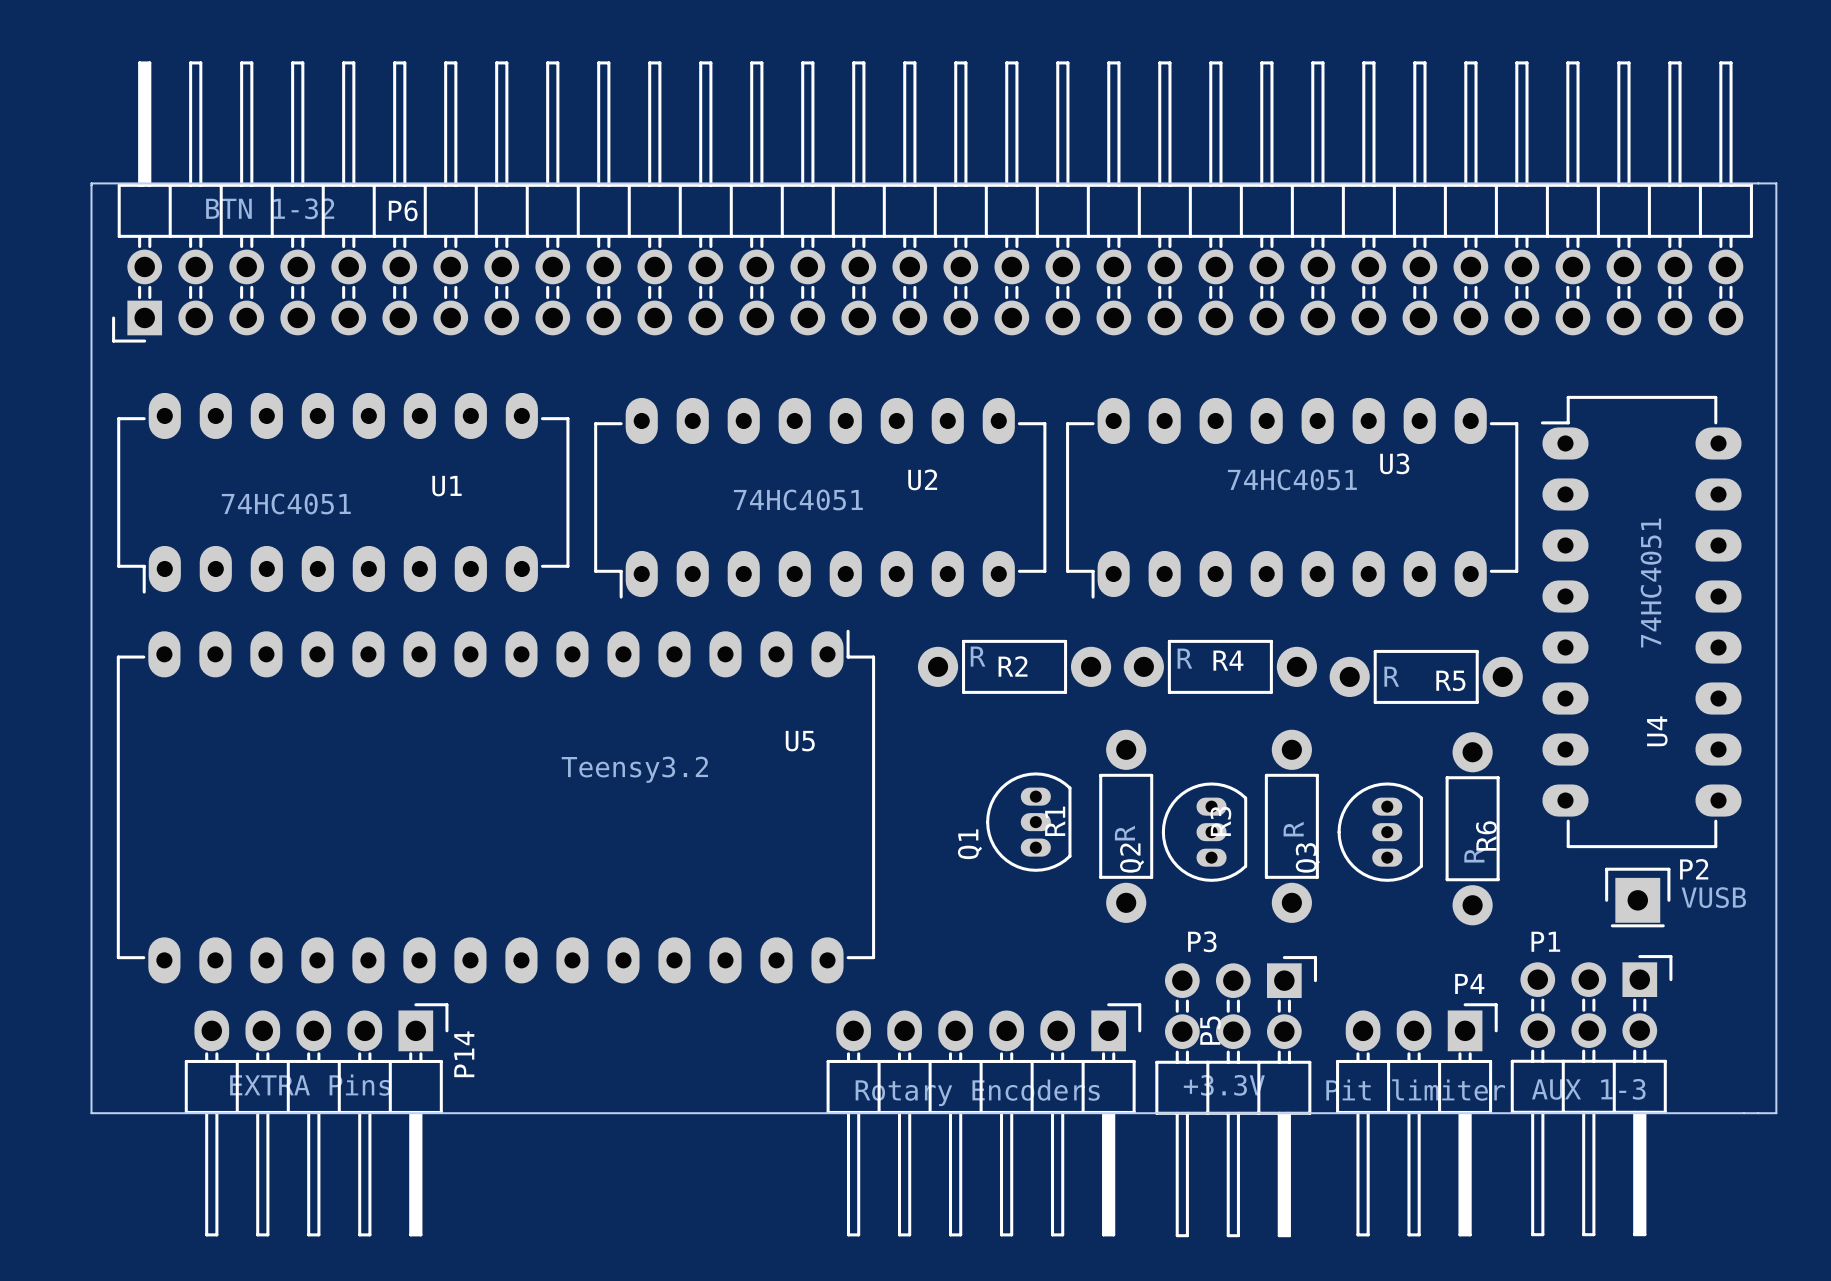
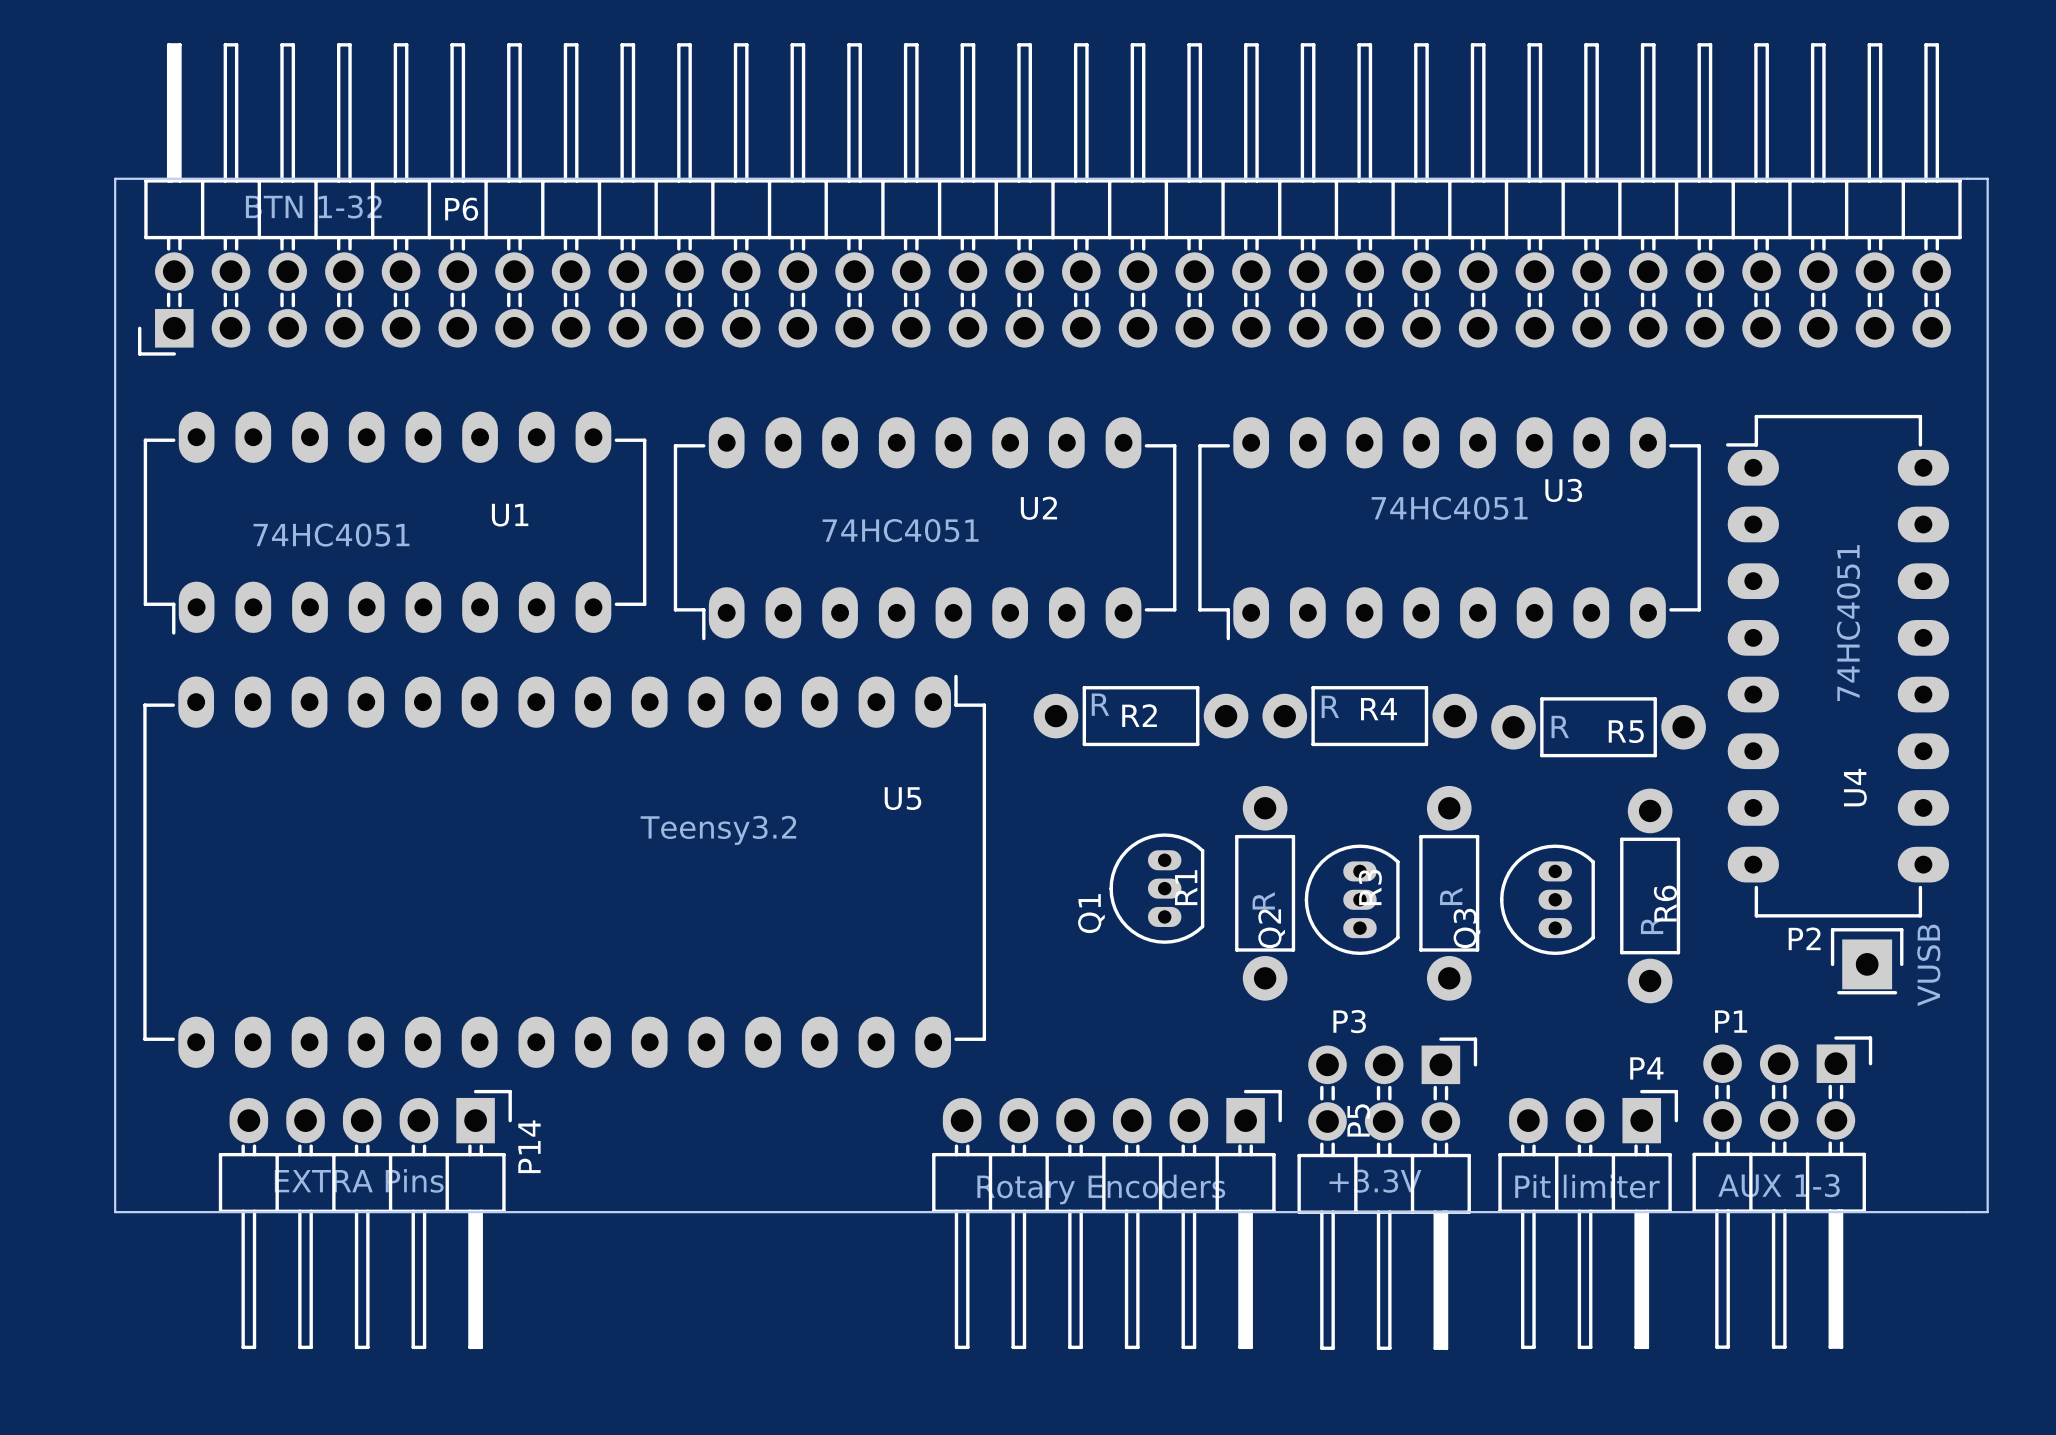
P2 name position: P2 (1694, 869) -> P2 (1804, 938)
P2 position: (1637, 897) -> (1867, 961)
P2 value rotation: 0° (1713, 897) -> 90° counterclockwise (1928, 965)

